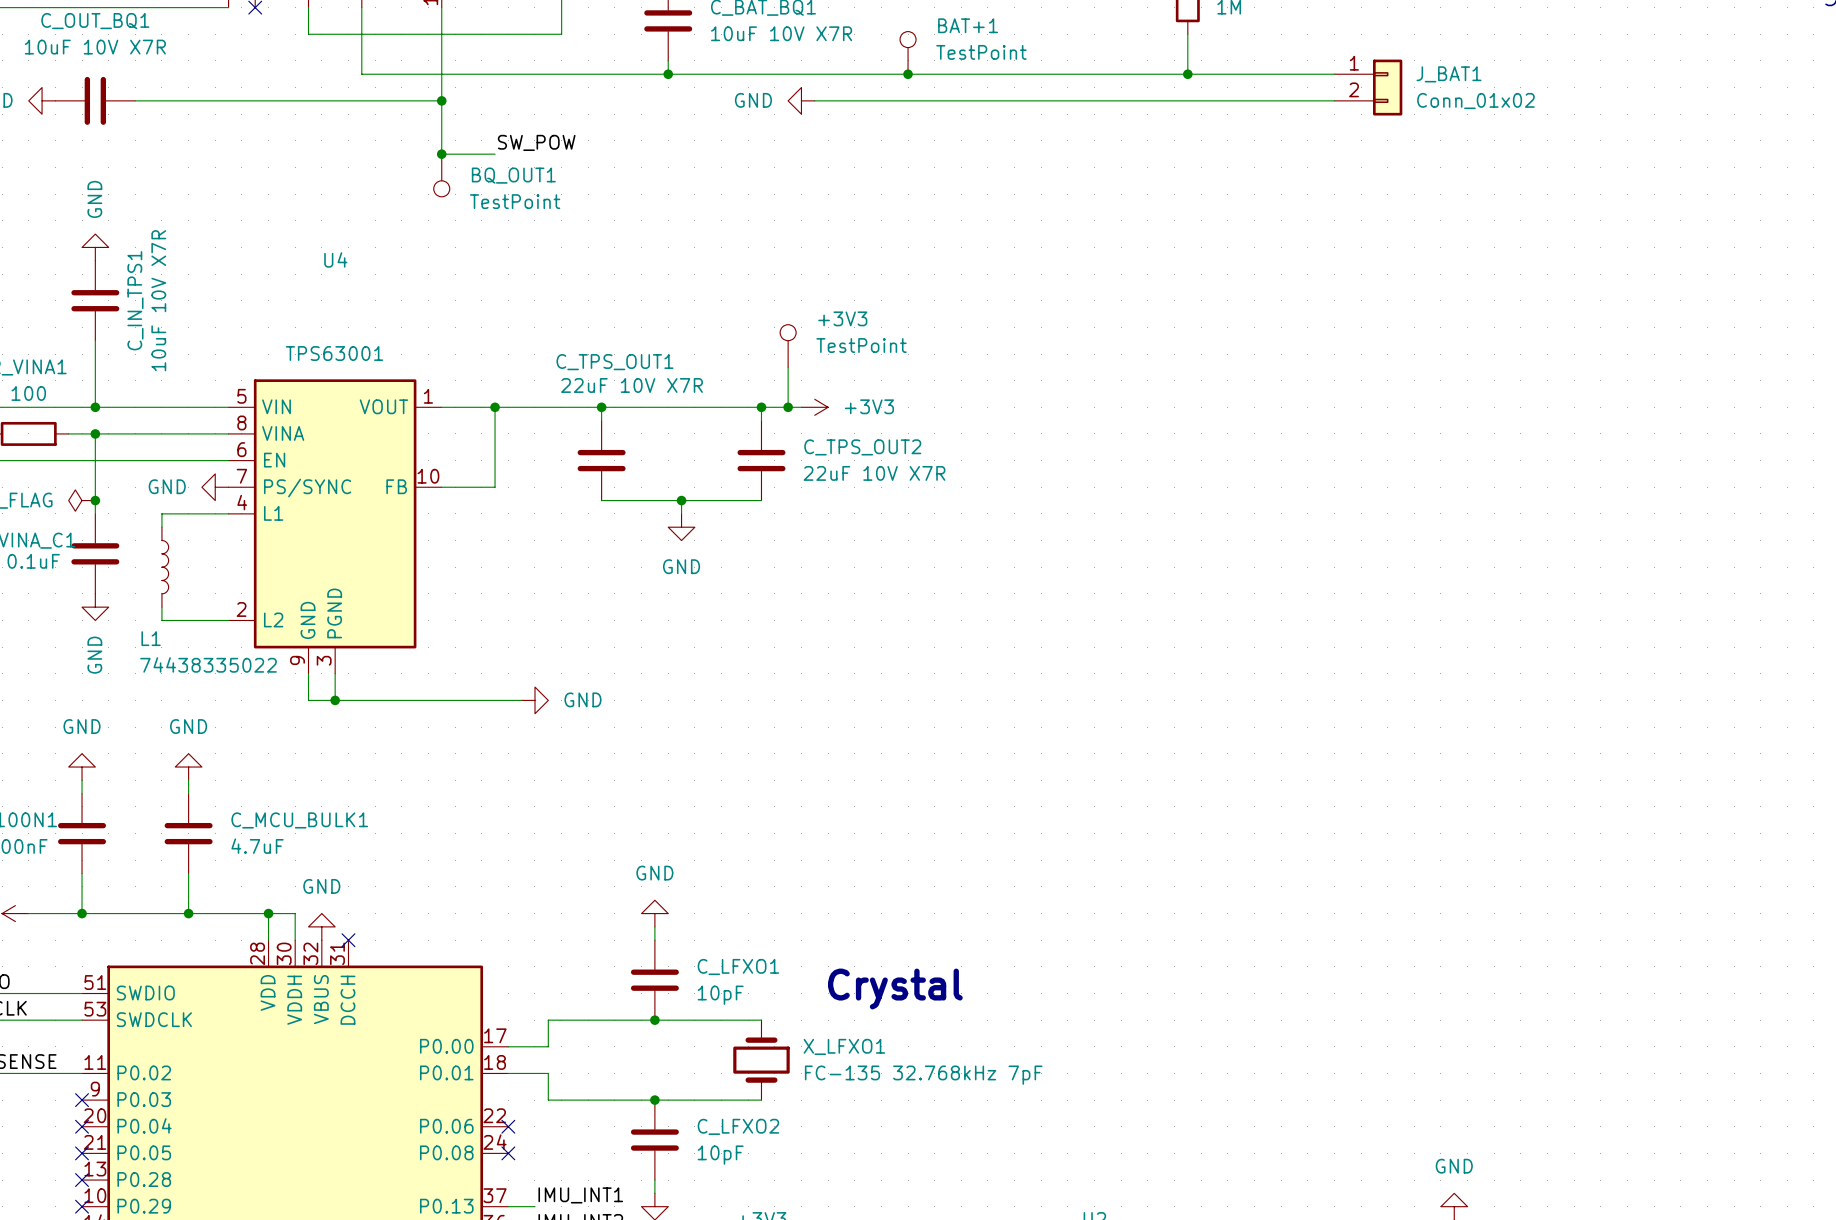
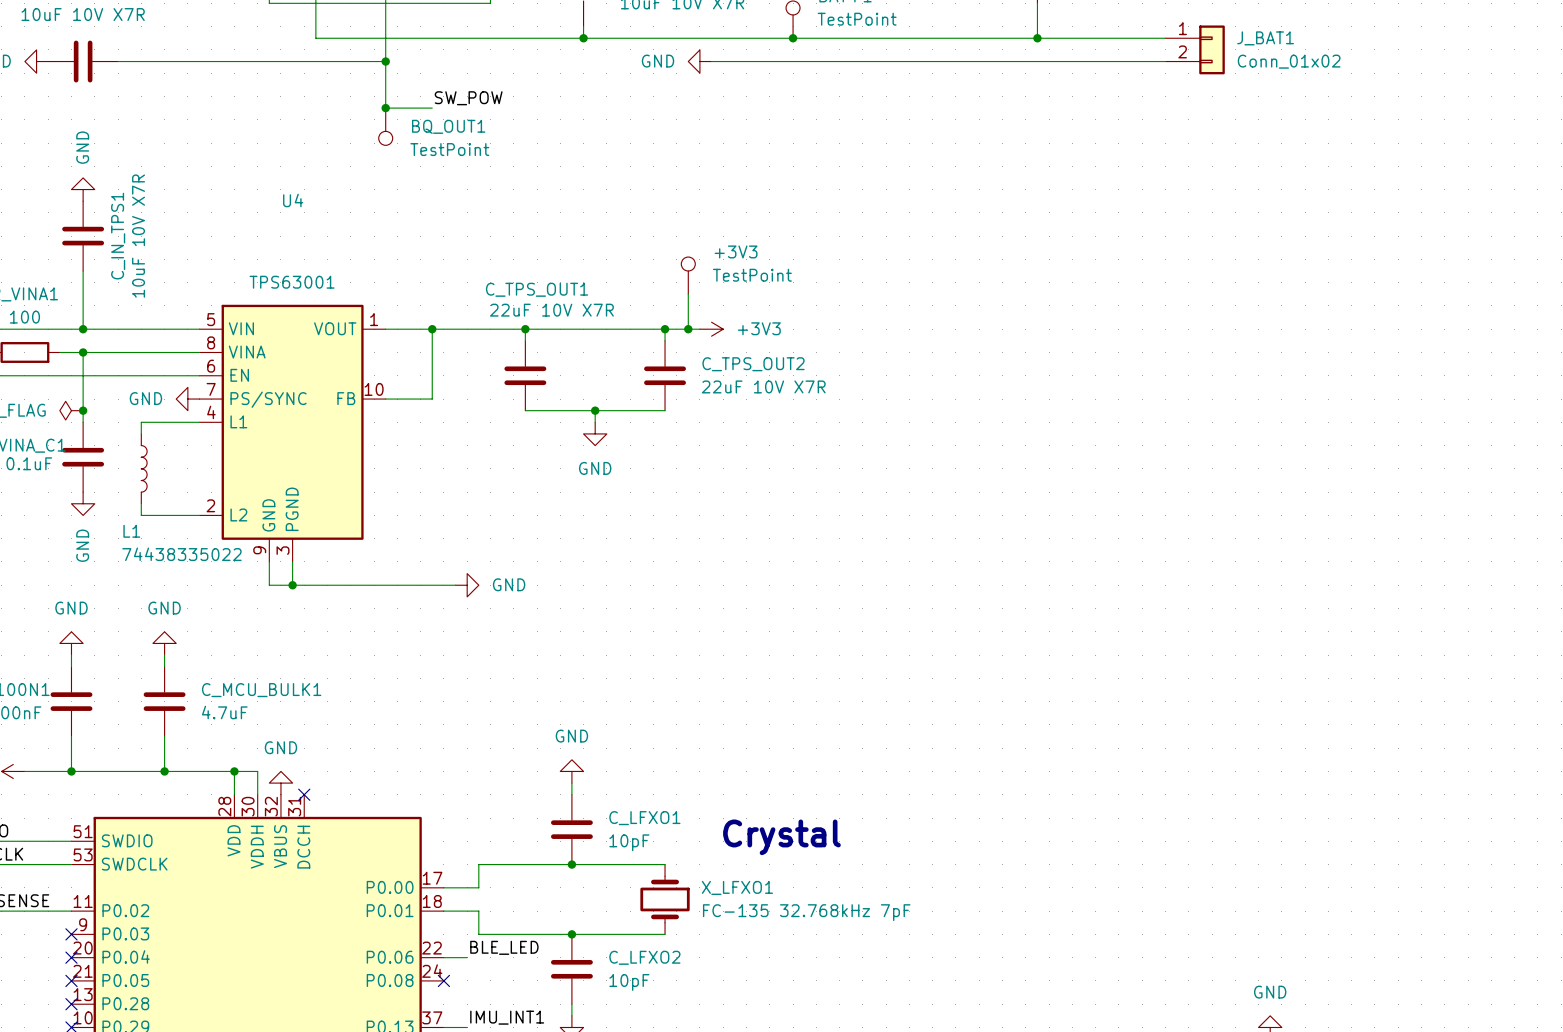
label: none -> BLE_LED (504, 947)
wire: none -> (443, 957) (467, 957)
no-connect mark: (508, 1126) -> none

